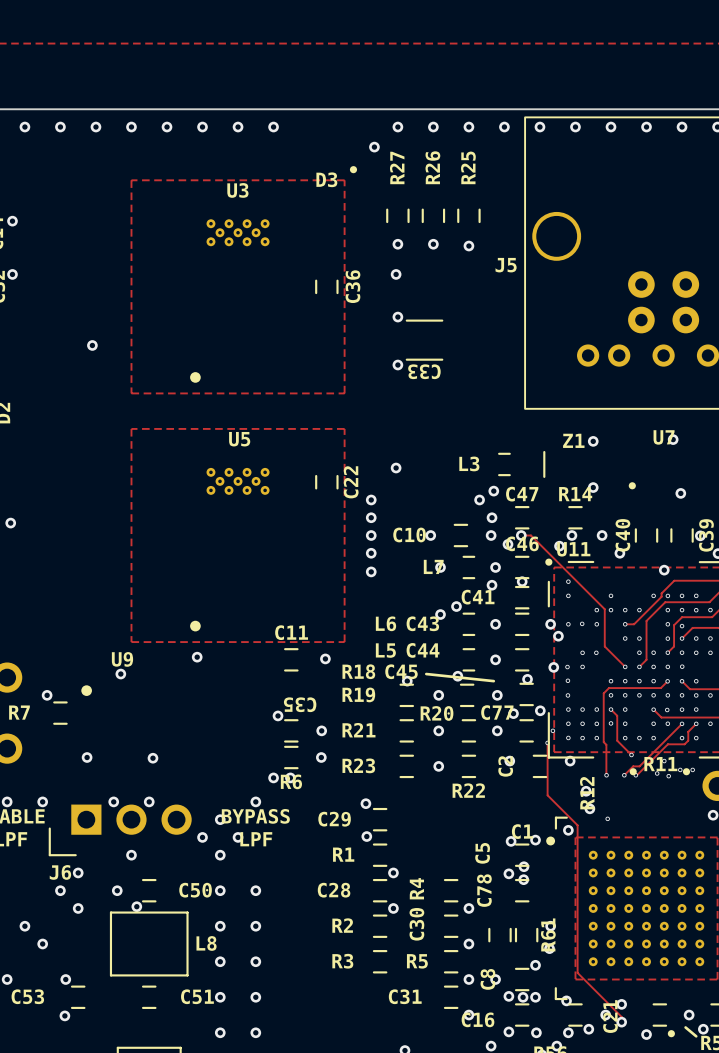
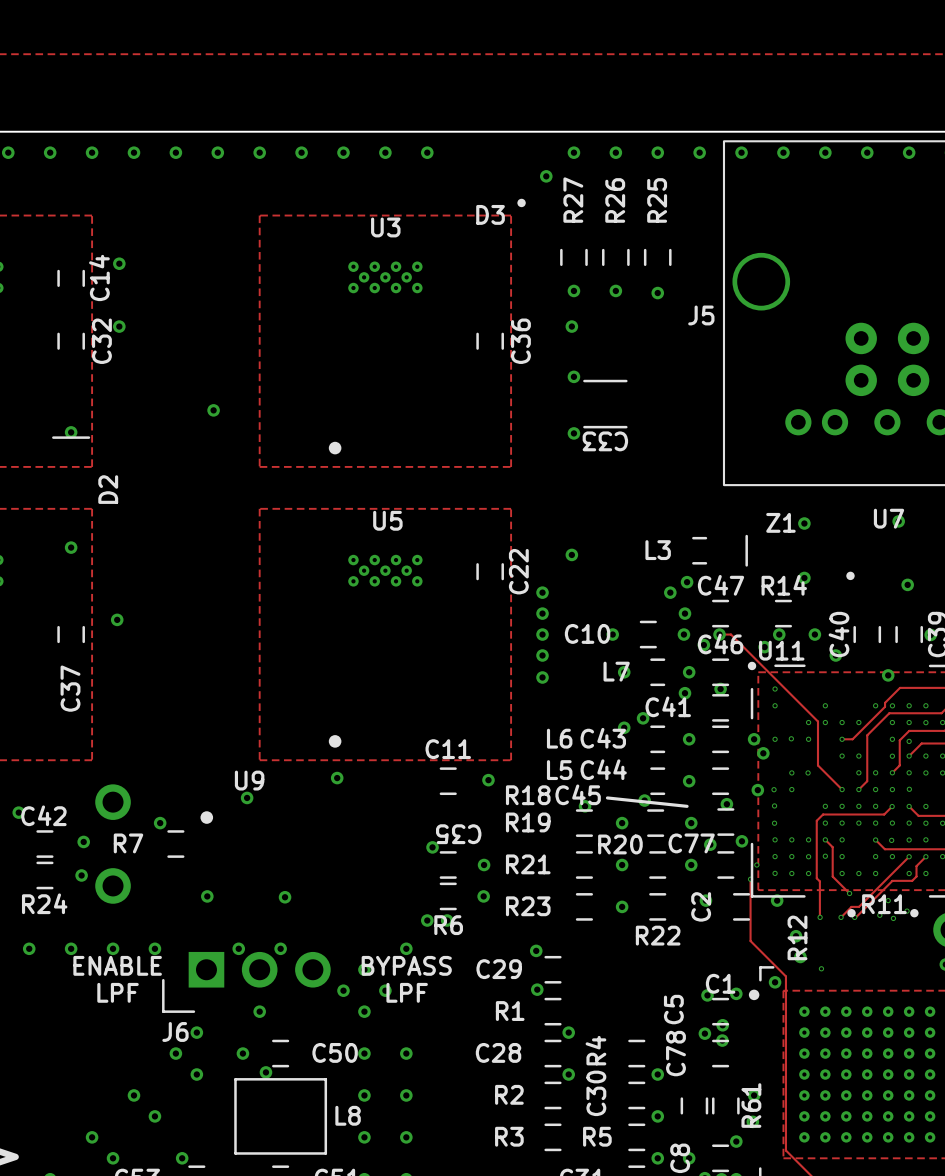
via: (692, 769) -> none

